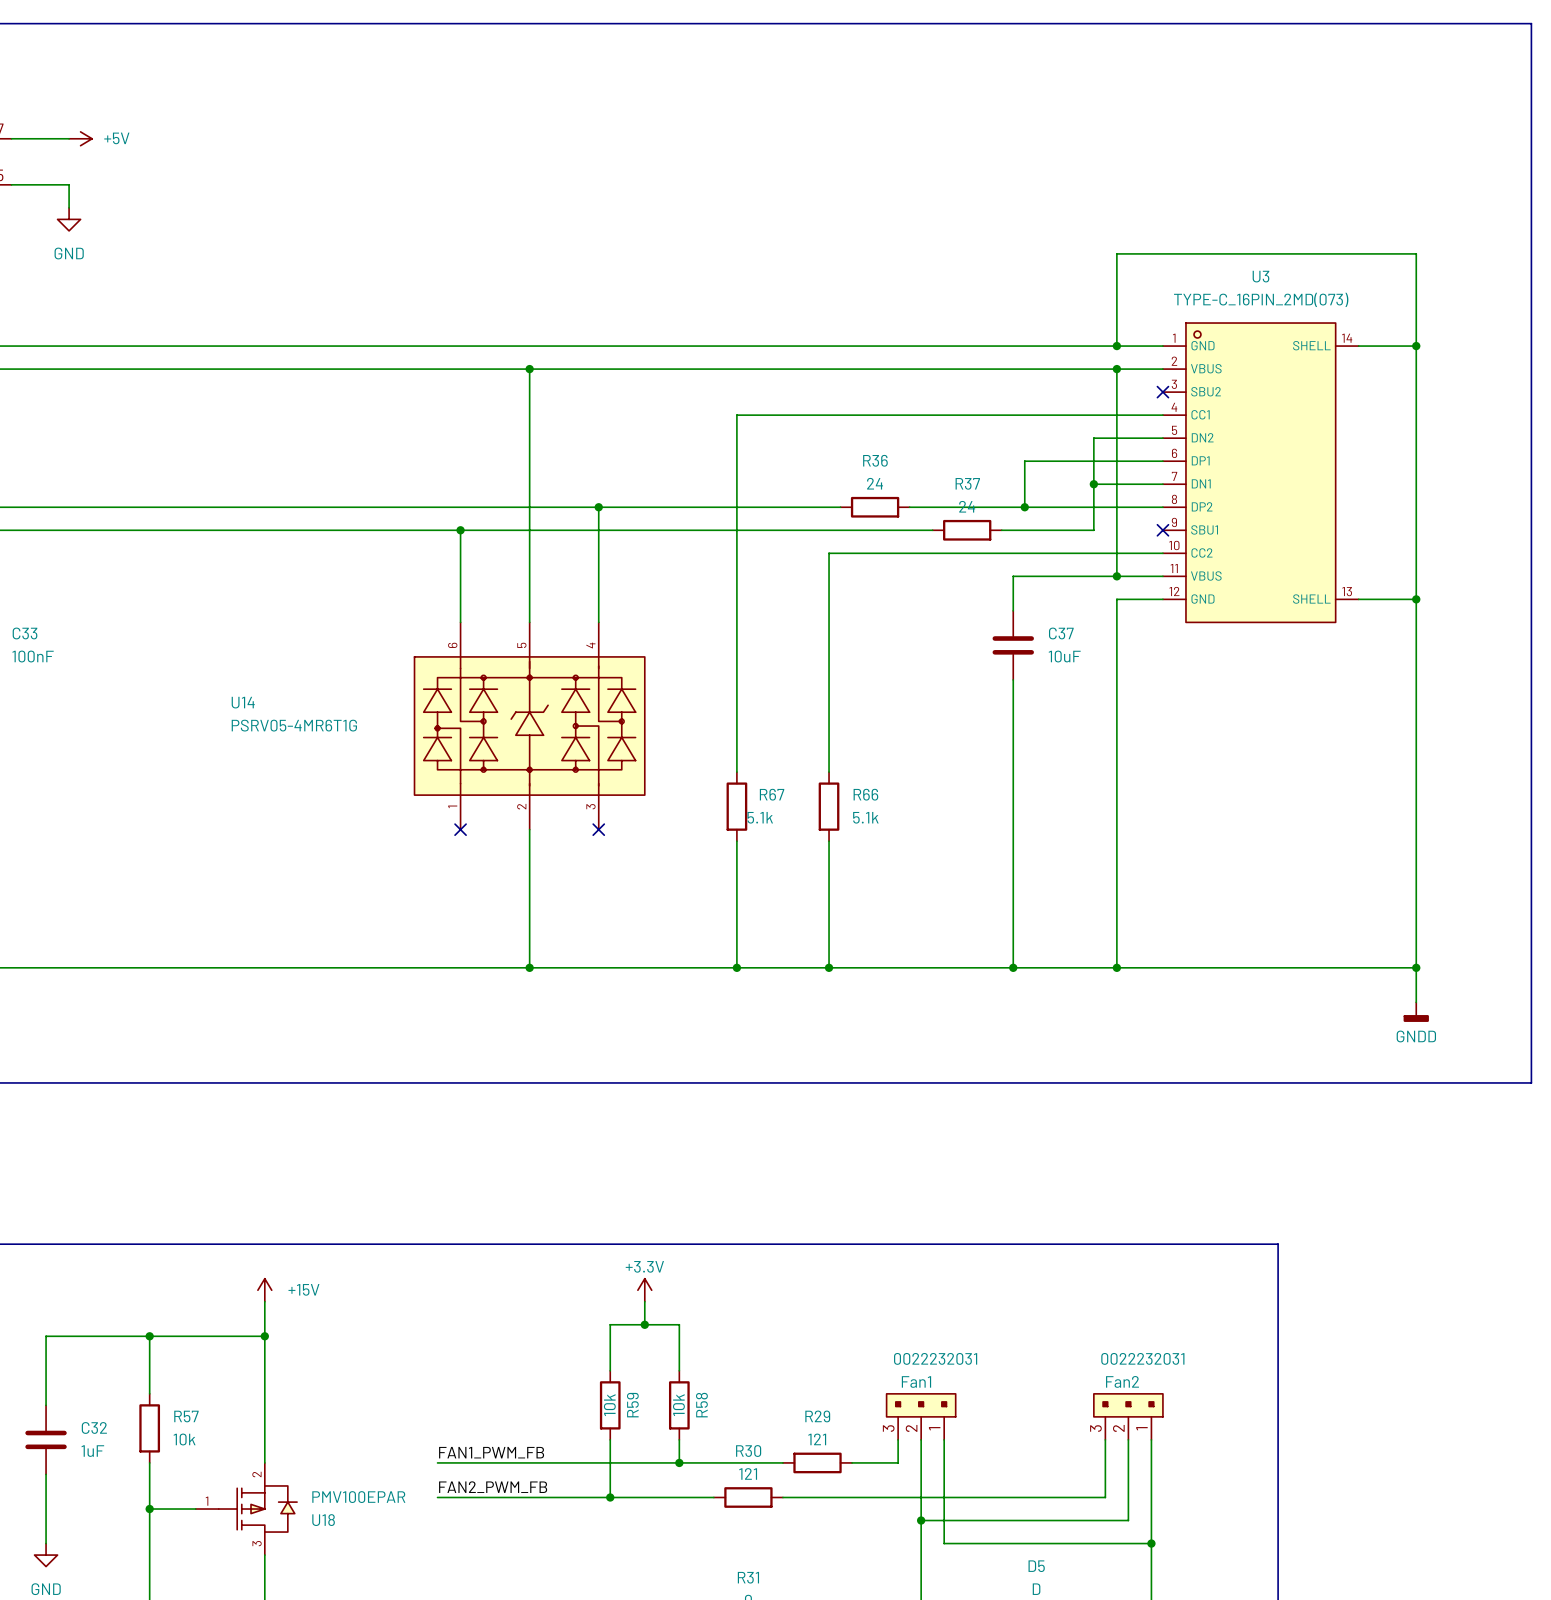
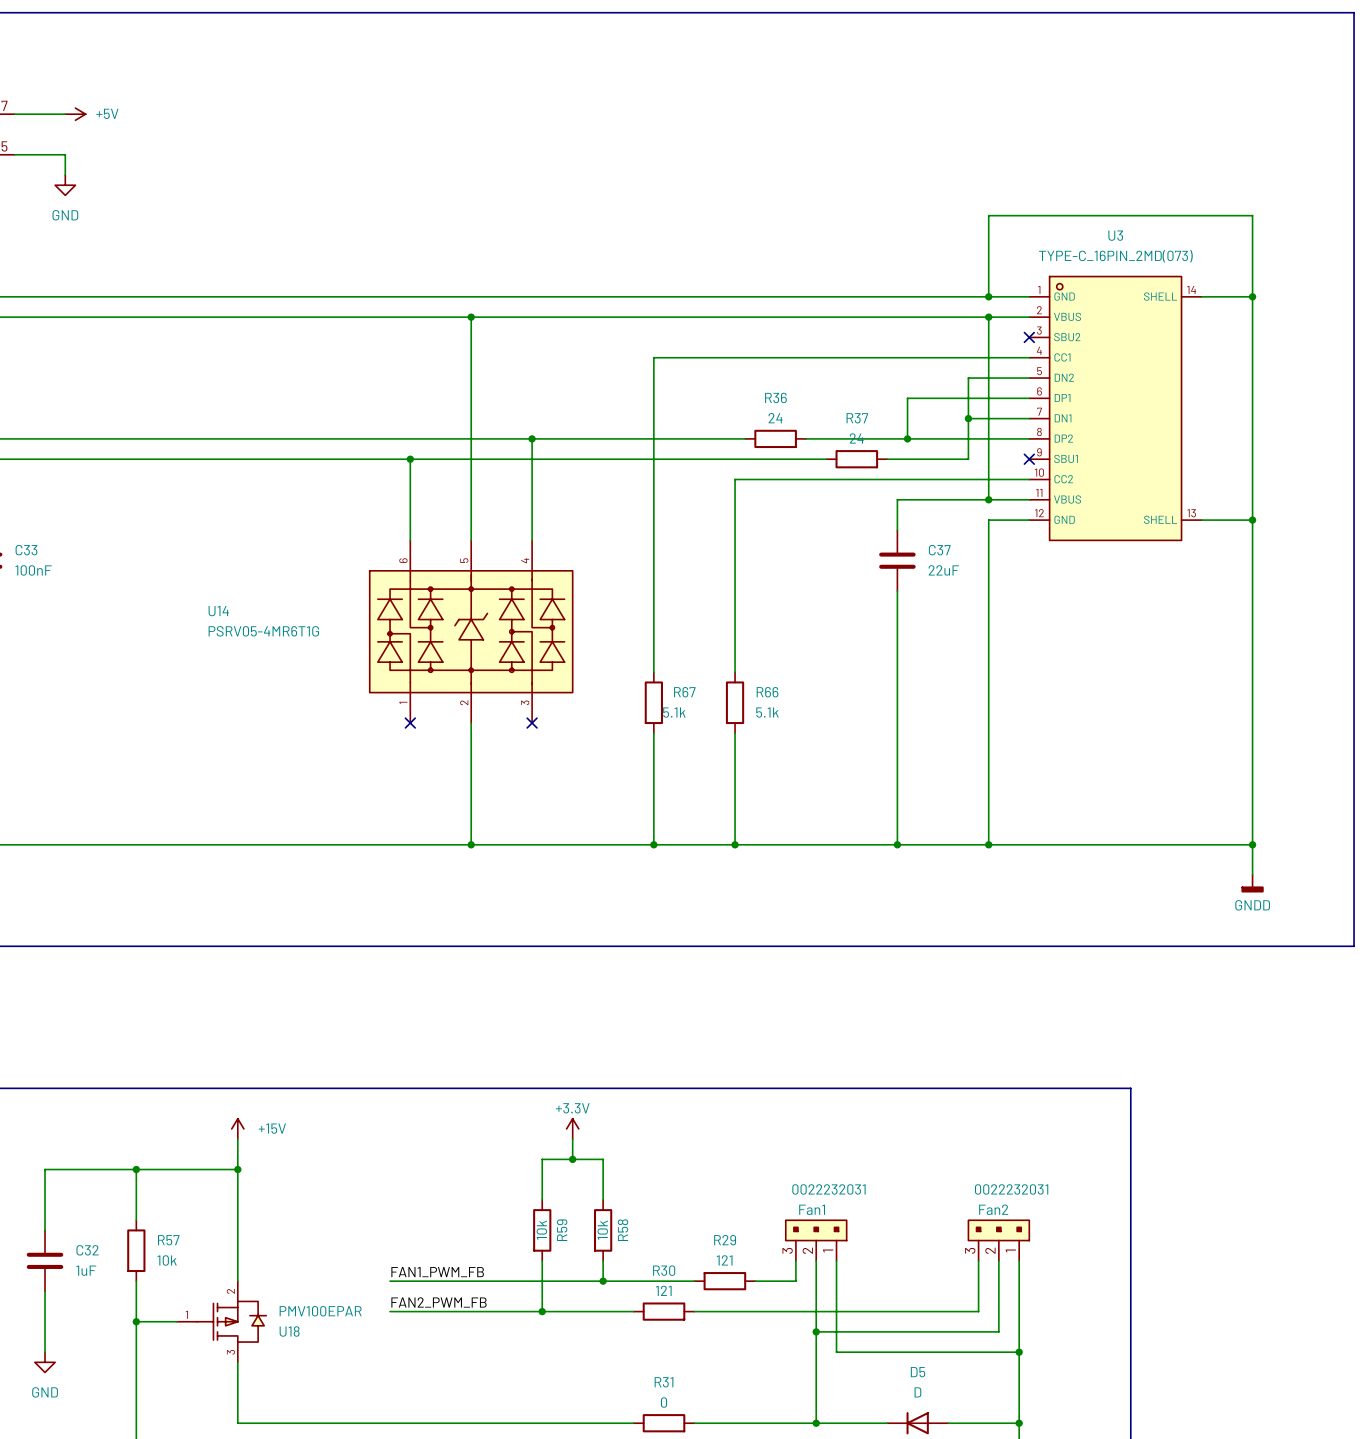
C37 value: 10uF (1064, 656) -> 22uF (943, 570)

